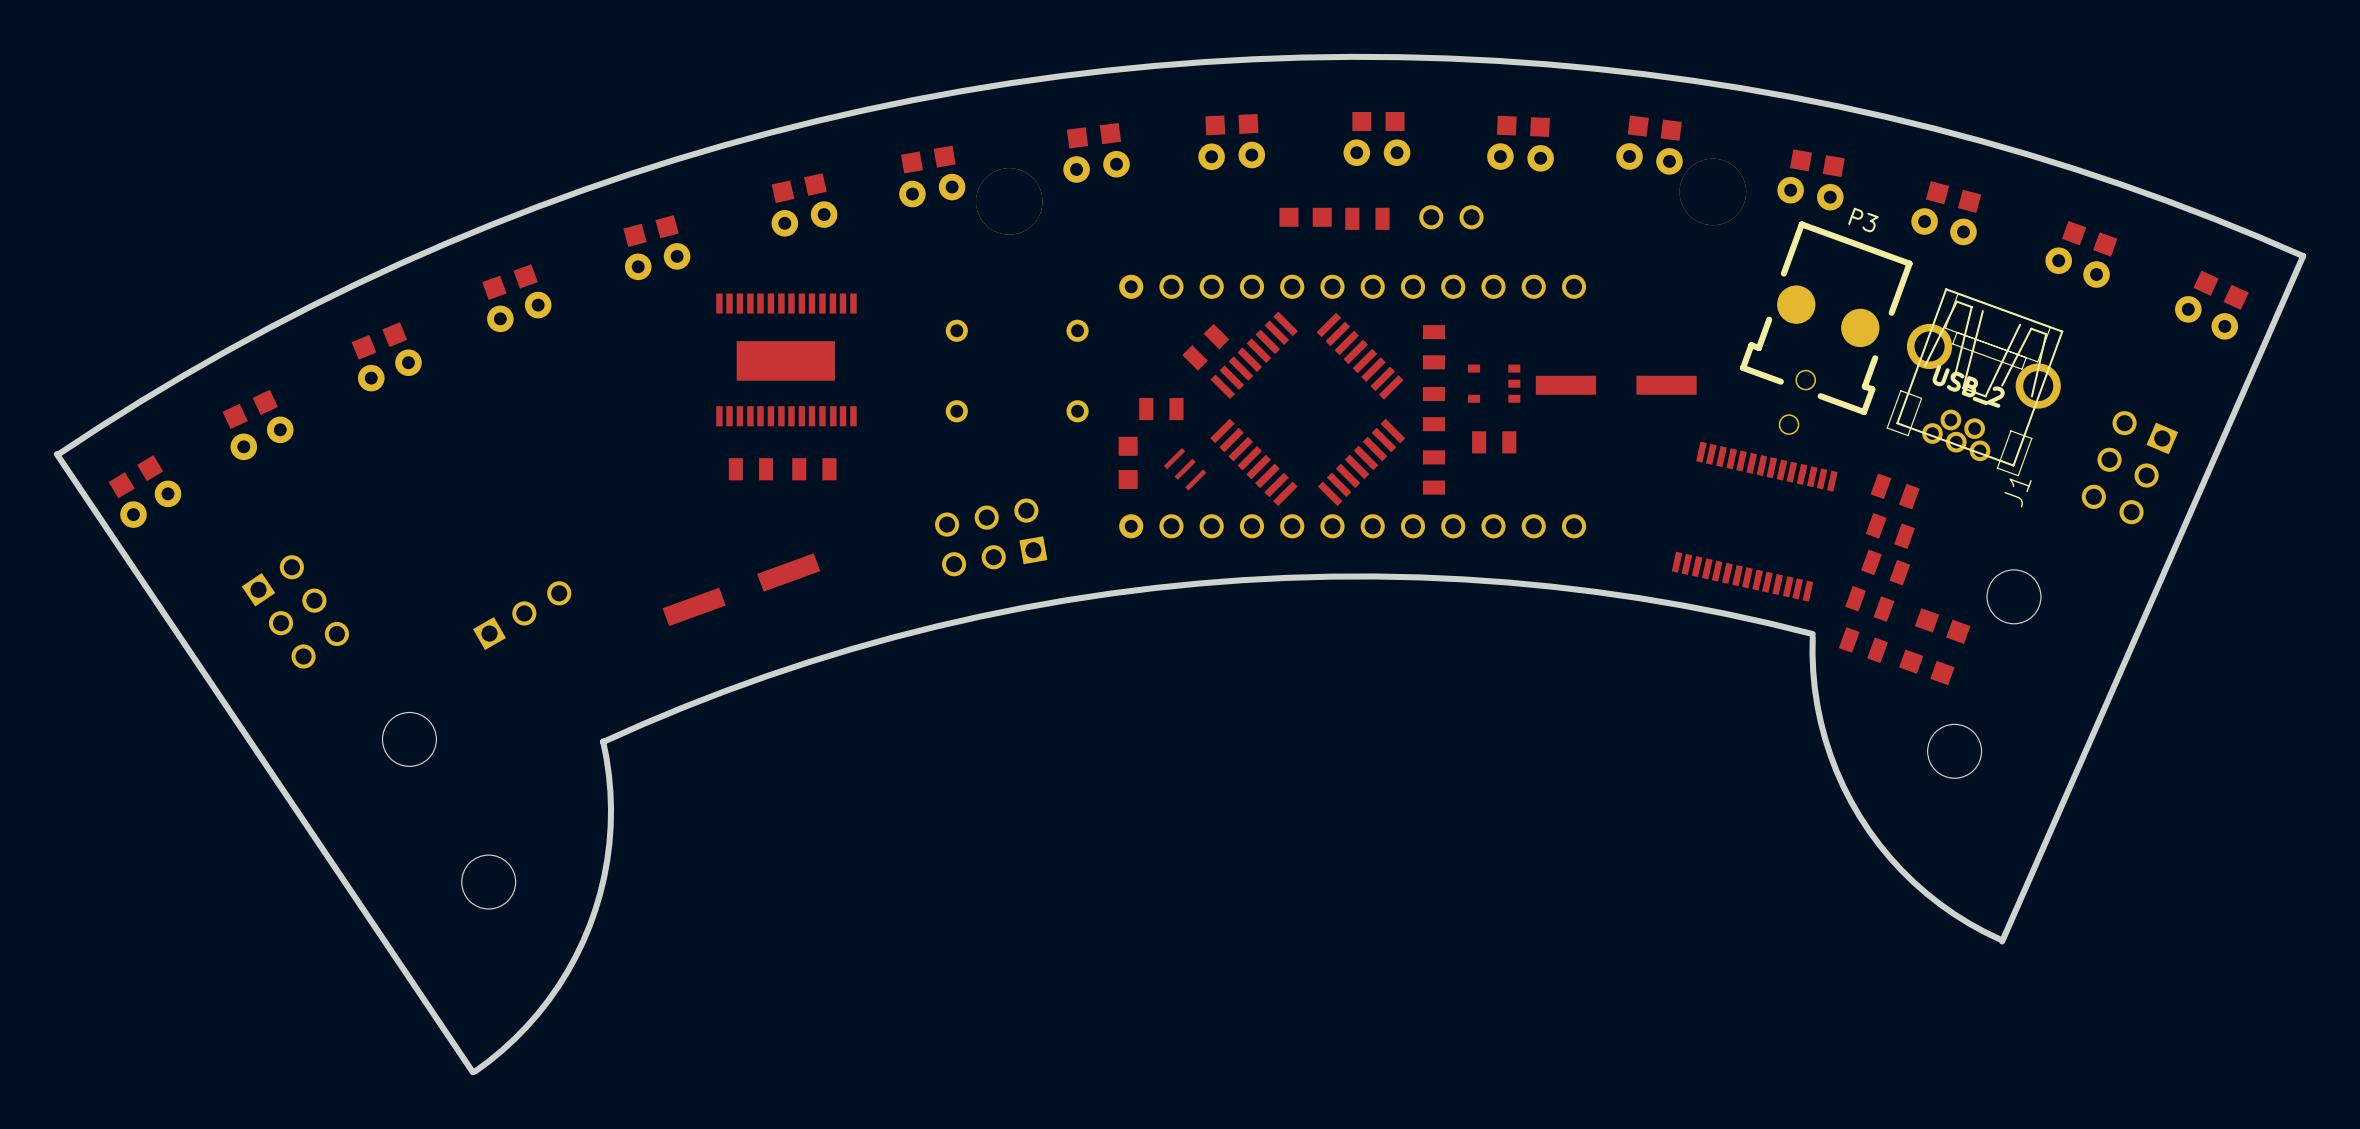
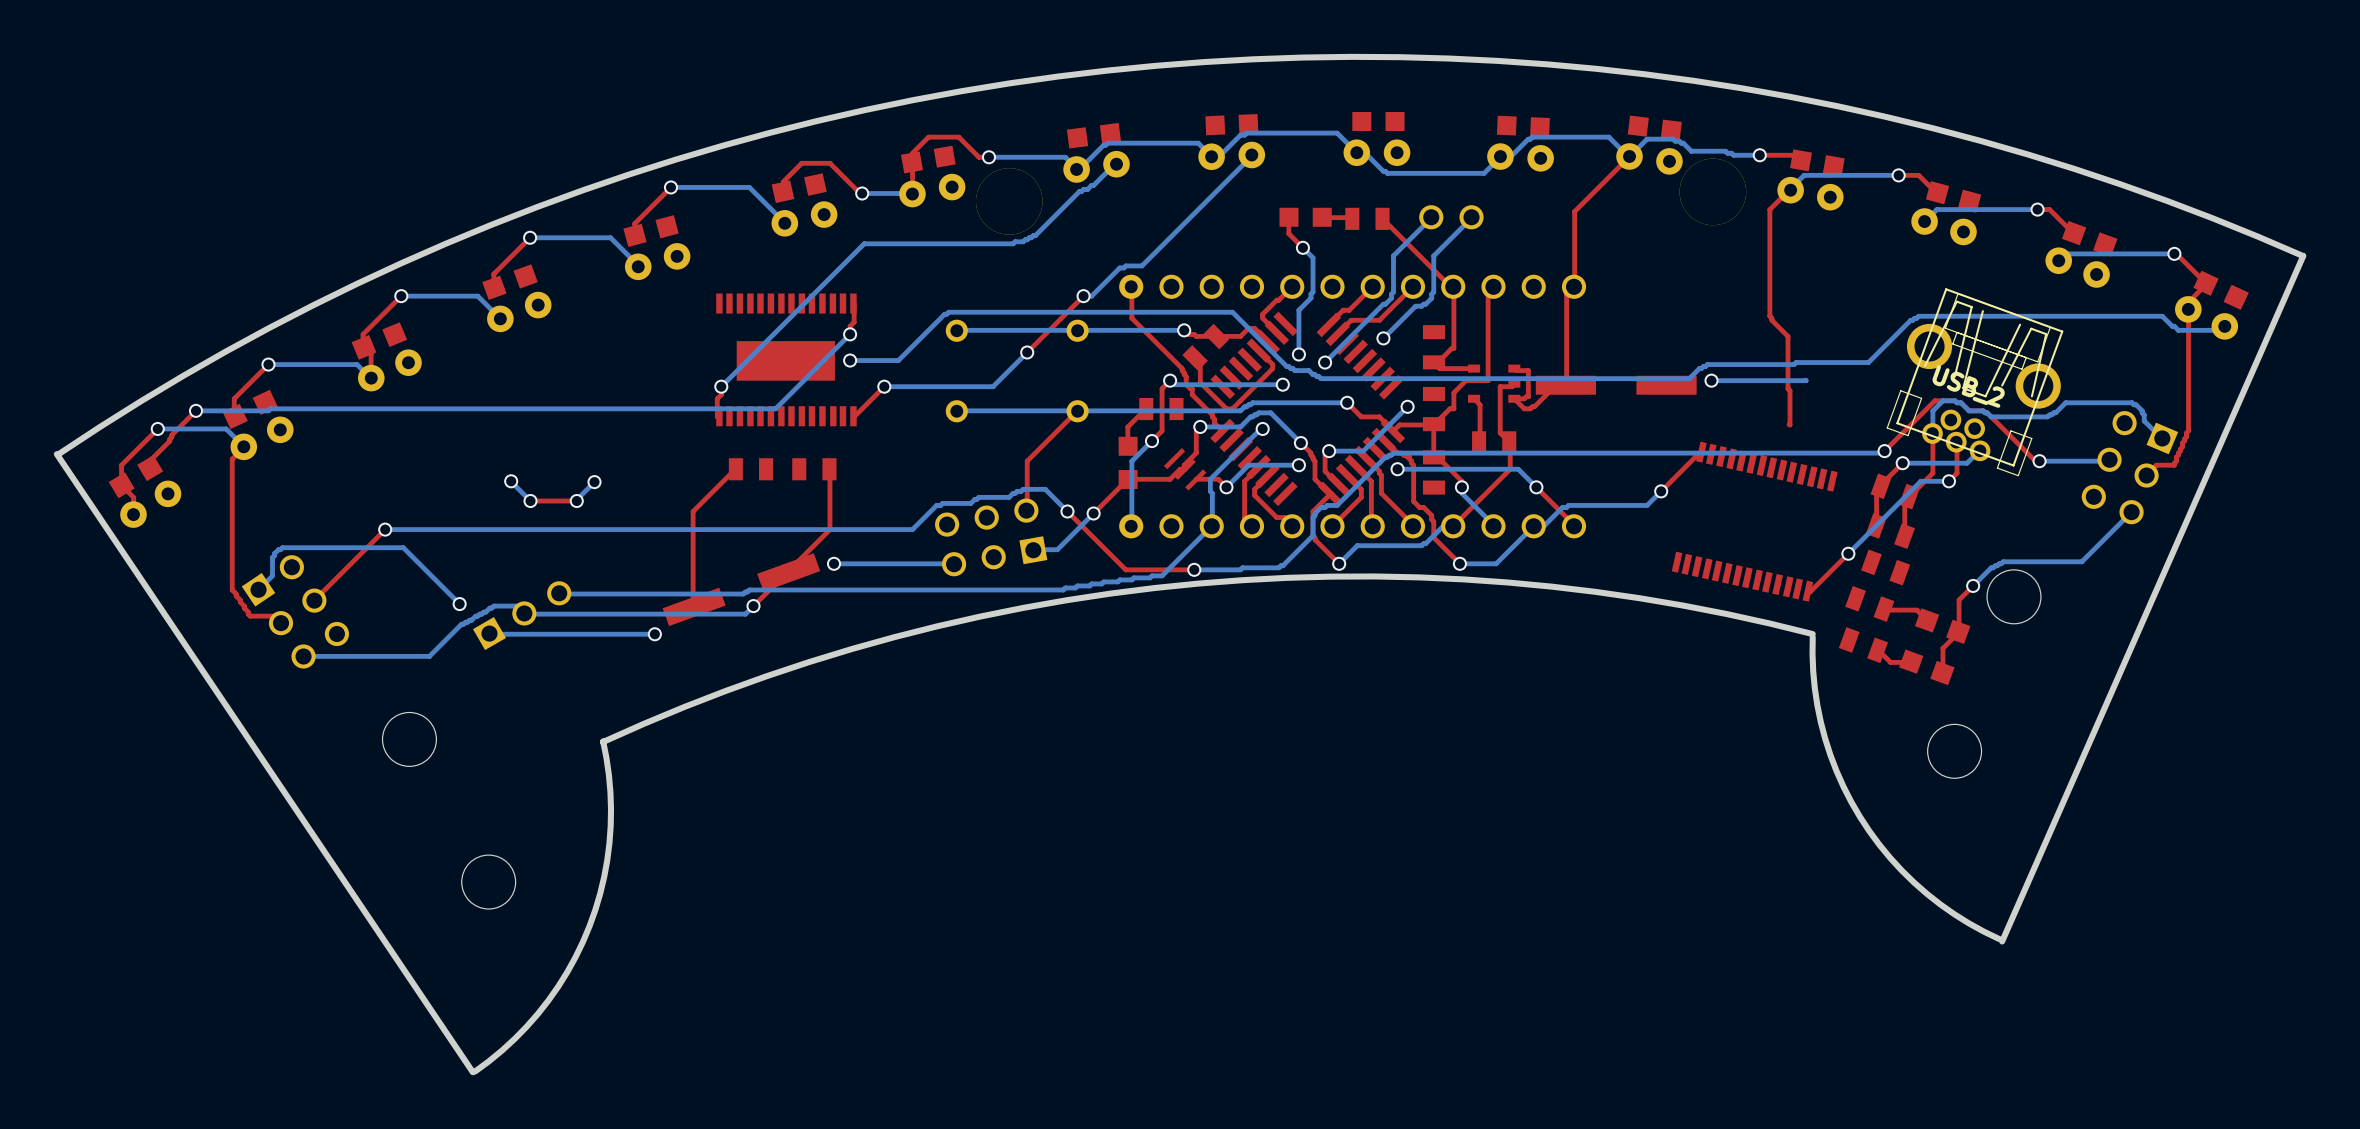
bottom track: none -> (1357, 153) (1337, 133) (1246, 133) (1240, 135) (1218, 157) (1212, 157)
bottom track: none -> (1357, 153) (1365, 153) (1387, 173) (1484, 173) (1500, 157)
bottom track: none -> (1251, 155) (1141, 265) (1119, 267) (1091, 296) (1083, 296)
bottom track: none -> (1759, 155) (1733, 155) (1725, 151) (1691, 151) (1683, 143) (1673, 139) (1647, 139) (1628, 157)
top track: none -> (1759, 155) (1794, 155) (1801, 160)
via: none -> (1759, 155)
top track: none -> (1629, 156) (1574, 211) (1574, 286)
bottom track: none -> (988, 157) (1065, 157) (1077, 169)
top track: none -> (988, 157) (978, 157) (958, 137) (928, 137) (912, 153) (912, 194)
via: none -> (988, 157)
bottom track: none -> (1212, 157) (1198, 143) (1107, 143) (1077, 169)
bottom track: none -> (1628, 157) (1608, 137) (1532, 137) (1510, 157) (1500, 157)
bottom track: none -> (1116, 164) (1093, 185) (1079, 191) (1035, 235) (1023, 241) (1015, 241) (1013, 243) (864, 243) (721, 386)
bottom track: none -> (1898, 175) (1804, 175) (1790, 190)
top track: none -> (1898, 175) (1918, 175) (1937, 192)
via: none -> (1898, 175)
bottom track: none -> (670, 187) (749, 187) (784, 223)
top track: none -> (670, 187) (634, 223) (635, 235)
via: none -> (670, 187)
top track: none -> (1790, 190) (1769, 209) (1769, 316) (1787, 336) (1789, 424)
top track: none -> (782, 191) (783, 181) (801, 163) (829, 163) (862, 193)
bottom track: none -> (862, 193) (912, 194)
via: none -> (862, 193)
bottom track: none -> (2037, 209) (1936, 209) (1924, 221)
top track: none -> (2037, 209) (2049, 209) (2074, 233)
via: none -> (2037, 209)
top track: none -> (1288, 217) (1288, 233) (1302, 247)
top track: none -> (1322, 217) (1352, 218)
bottom track: none -> (1431, 217) (1393, 255) (1393, 292) (1391, 298) (1325, 362)
bottom track: none -> (1471, 217) (1433, 255) (1433, 292) (1431, 298) (1421, 306) (1415, 306) (1383, 338)
top track: none -> (1382, 218) (1449, 286) (1453, 286)
bottom track: none -> (530, 237) (610, 237) (638, 266)
top track: none -> (530, 237) (493, 273) (494, 287)
via: none -> (530, 237)
bottom track: none -> (1302, 247) (1313, 257) (1313, 292) (1310, 298) (1298, 310) (1298, 354)
via: none -> (1302, 247)
bottom track: none -> (2174, 253) (2065, 253) (2058, 260)
top track: none -> (2174, 253) (2206, 284)
via: none -> (2174, 253)
top track: none -> (2206, 284) (2188, 302) (2188, 430) (2174, 465) (2156, 465) (2146, 475)
top track: none -> (1131, 286) (1131, 318) (1182, 368) (1186, 376) (1186, 384) (1192, 388) (1192, 394) (1212, 414) (1214, 422) (1222, 430)
top track: none -> (1292, 286) (1262, 314) (1262, 318) (1276, 332)
top track: none -> (1372, 286) (1349, 310) (1343, 310) (1328, 324)
top track: none -> (1412, 286) (1379, 320) (1351, 320) (1337, 333)
top track: none -> (1453, 286) (1453, 348) (1437, 362) (1433, 362) (1439, 368) (1474, 368)
top track: none -> (1493, 286) (1488, 292) (1488, 380) (1465, 380) (1453, 392) (1453, 408) (1449, 408) (1433, 424)
top track: none -> (1574, 286) (1566, 294) (1566, 384)
bottom track: none -> (401, 296) (477, 296) (500, 318)
top track: none -> (401, 296) (363, 334) (363, 346) (371, 354) (371, 378)
via: none -> (401, 296)
top track: none -> (1083, 296) (1027, 352)
via: none -> (1083, 296)
top track: none -> (853, 303) (854, 322) (850, 326) (850, 334)
bottom track: none -> (2224, 326) (2220, 330) (2178, 330) (2162, 316) (1918, 316) (1910, 320) (1868, 362) (1707, 364) (1699, 368) (1689, 378) (1321, 378) (1308, 370) (1294, 370) (1286, 366) (1232, 312) (948, 312) (898, 360) (850, 360)
P3: (1826, 328) -> none
bottom track: none -> (1184, 330) (956, 330)
top track: none -> (1184, 330) (1188, 334) (1196, 336) (1240, 336) (1248, 328) (1254, 328) (1267, 341)
via: none -> (1184, 330)
bottom track: none -> (850, 334) (775, 408) (270, 408) (268, 410) (196, 410)
via: none -> (850, 334)
via: none -> (1383, 338)
top track: none -> (1258, 350) (1272, 364) (1272, 368) (1232, 408) (1226, 408) (1200, 382) (1200, 364) (1195, 357)
bottom track: none -> (1027, 352) (993, 386) (884, 386)
via: none -> (1027, 352)
via: none -> (1298, 354)
via: none -> (850, 360)
via: none -> (1325, 362)
bottom track: none -> (268, 364) (357, 364) (371, 378)
top track: none -> (268, 364) (234, 398) (235, 416)
via: none -> (268, 364)
top track: none -> (1514, 368) (1516, 370) (1528, 370) (1528, 396) (1514, 398) (1524, 408) (1534, 406) (1556, 384) (1566, 384)
bottom track: none -> (1170, 380) (1174, 384) (1282, 384)
top track: none -> (1170, 380) (1162, 388) (1162, 430) (1152, 441)
via: none -> (1170, 380)
via: none -> (1711, 380)
bottom track: none -> (1805, 380) (1711, 380)
top track: none -> (1514, 383) (1512, 386) (1500, 386) (1500, 432) (1510, 443)
via: none -> (1282, 384)
top track: none -> (721, 386) (721, 394) (717, 398) (717, 416) (719, 416)
via: none -> (721, 386)
top track: none -> (884, 386) (853, 416)
via: none -> (884, 386)
top track: none -> (1474, 398) (1480, 404) (1479, 442)
bottom track: none -> (1347, 402) (1252, 402) (1240, 410) (956, 411)
top track: none -> (1347, 402) (1361, 416) (1379, 416) (1393, 430)
via: none -> (1347, 402)
bottom track: none -> (1407, 406) (1363, 451) (1329, 451)
via: none -> (1407, 406)
top track: none -> (1146, 409) (1127, 426) (1128, 446)
top track: none -> (196, 410) (149, 461) (150, 468)
via: none -> (196, 410)
top track: none -> (1077, 411) (1027, 461) (1026, 510)
top track: none -> (1433, 424) (1433, 457)
top track: none -> (1433, 424) (1399, 424) (1393, 430)
bottom track: none -> (1200, 426) (1240, 426) (1250, 416) (1258, 412) (1270, 412) (1300, 443)
top track: none -> (1200, 426) (1196, 430) (1196, 453) (1184, 465) (1184, 469)
via: none -> (1200, 426)
bottom track: none -> (157, 428) (226, 428) (243, 446)
top track: none -> (157, 428) (121, 465) (121, 485) (133, 497) (133, 514)
via: none -> (157, 428)
bottom track: none -> (1262, 428) (1210, 479) (1212, 525)
via: none -> (1262, 428)
bottom track: none -> (1932, 433) (1932, 410) (1942, 400) (1961, 402) (1969, 410) (1983, 410) (1991, 416) (2047, 416) (2055, 412) (2065, 402) (2132, 402) (2142, 410) (2144, 420) (2162, 438)
top track: none -> (1932, 433) (1932, 473) (1904, 501) (1904, 536)
top track: none -> (1383, 439) (1397, 453) (1409, 457) (1413, 465) (1413, 501) (1431, 515) (1433, 537) (1459, 563)
bottom track: none -> (1152, 441) (1131, 461) (1131, 526)
via: none -> (1152, 441)
top track: none -> (1956, 442) (1957, 473) (1948, 481)
top track: none -> (1300, 443) (1310, 453) (1315, 461) (1315, 479) (1331, 493)
via: none -> (1300, 443)
top track: none -> (1510, 443) (1510, 469) (1453, 526)
top track: none -> (243, 446) (232, 459) (232, 589) (250, 616) (274, 616) (281, 623)
bottom track: none -> (1980, 450) (1967, 463) (1902, 463)
top track: none -> (1329, 451) (1325, 455) (1325, 471) (1339, 484)
via: none -> (1329, 451)
bottom track: none -> (1884, 451) (1882, 453) (1393, 453) (1385, 457) (1337, 505) (1321, 507) (1315, 513) (1313, 517) (1313, 535) (1282, 565) (1278, 567) (1242, 567) (1240, 569) (1194, 569)
top track: none -> (1884, 451) (1934, 400) (1955, 400) (1961, 402) (1969, 410) (1983, 410) (1987, 412) (2035, 461) (2039, 461)
via: none -> (1884, 451)
top track: none -> (1701, 452) (1661, 491)
top track: none -> (1366, 457) (1381, 475) (1381, 493) (1412, 526)
top track: none -> (1433, 457) (1437, 457) (1461, 481) (1461, 487)
bottom track: none -> (2109, 459) (2039, 461)
via: none -> (2039, 461)
top track: none -> (1902, 463) (1876, 489) (1876, 525)
via: none -> (1902, 463)
bottom track: none -> (1298, 465) (1248, 465) (1226, 487)
via: none -> (1298, 465)
top track: none -> (1357, 466) (1371, 481) (1372, 526)
top track: none -> (1258, 467) (1244, 481) (1244, 517) (1251, 526)
top track: none -> (735, 469) (693, 511) (694, 606)
top track: none -> (829, 469) (829, 529) (753, 606)
top track: none -> (1184, 469) (1180, 469) (1170, 479) (1127, 479)
bottom track: none -> (1397, 469) (1518, 469) (1536, 487)
via: none -> (1397, 469)
top track: none -> (1267, 475) (1254, 489) (1254, 495) (1276, 517) (1284, 517) (1292, 526)
top track: none -> (1348, 475) (1361, 489) (1361, 497) (1332, 526)
top track: none -> (1127, 479) (1093, 513)
top track: none -> (1195, 479) (1218, 479) (1226, 487)
bottom track: none -> (511, 481) (530, 501)
via: none -> (511, 481)
bottom track: none -> (1948, 481) (1920, 481) (1848, 553)
via: none -> (1948, 481)
bottom track: none -> (594, 482) (576, 501)
via: none -> (594, 482)
via: none -> (1226, 487)
bottom track: none -> (1461, 487) (1461, 493) (1493, 526)
via: none -> (1461, 487)
top track: none -> (1536, 487) (1574, 526)
via: none -> (1536, 487)
bottom track: none -> (1661, 491) (1647, 505) (1568, 505) (1562, 507) (1544, 525) (1534, 525)
via: none -> (1661, 491)
J1 name: J1 (2018, 492) -> none
top track: none -> (1331, 493) (1313, 511) (1313, 535) (1339, 563)
via: none -> (530, 501)
top track: none -> (576, 501) (530, 501)
via: none -> (576, 501)
bottom track: none -> (1067, 511) (1045, 489) (1023, 489) (1009, 497) (978, 497) (970, 503) (942, 503) (936, 505) (912, 529) (385, 529)
top track: none -> (1067, 511) (1125, 569) (1194, 569)
via: none -> (1067, 511)
bottom track: none -> (2131, 512) (2081, 561) (2003, 561) (1991, 567) (1973, 585)
bottom track: none -> (1093, 513) (1057, 549) (1033, 550)
via: none -> (1093, 513)
bottom track: none -> (1212, 525) (1162, 575) (1103, 581) (1089, 585) (1065, 587) (1063, 589) (749, 589) (743, 594) (559, 593)
bottom track: none -> (1534, 525) (1496, 563) (1459, 563)
bottom track: none -> (1453, 526) (1443, 525) (1421, 545) (1357, 545) (1339, 563)
top track: none -> (385, 529) (314, 600)
via: none -> (385, 529)
top track: none -> (1848, 553) (1810, 591) (1807, 591)
via: none -> (1848, 553)
bottom track: none -> (834, 563) (954, 564)
via: none -> (834, 563)
via: none -> (1339, 563)
via: none -> (1459, 563)
via: none -> (1194, 569)
top track: none -> (1973, 585) (1959, 600) (1959, 632)
via: none -> (1973, 585)
bottom track: none -> (258, 589) (272, 575) (272, 557) (282, 547) (403, 547) (459, 604)
via: none -> (459, 604)
bottom track: none -> (753, 606) (745, 614) (524, 614)
via: none -> (753, 606)
top track: none -> (1883, 609) (1916, 610) (1927, 620)
bottom track: none -> (524, 614) (516, 606) (493, 606) (461, 624) (429, 656) (303, 656)
top track: none -> (1959, 632) (1942, 648) (1942, 673)
bottom track: none -> (489, 633) (654, 634)
via: none -> (654, 634)
top track: none -> (1877, 650) (1890, 662) (1911, 661)

